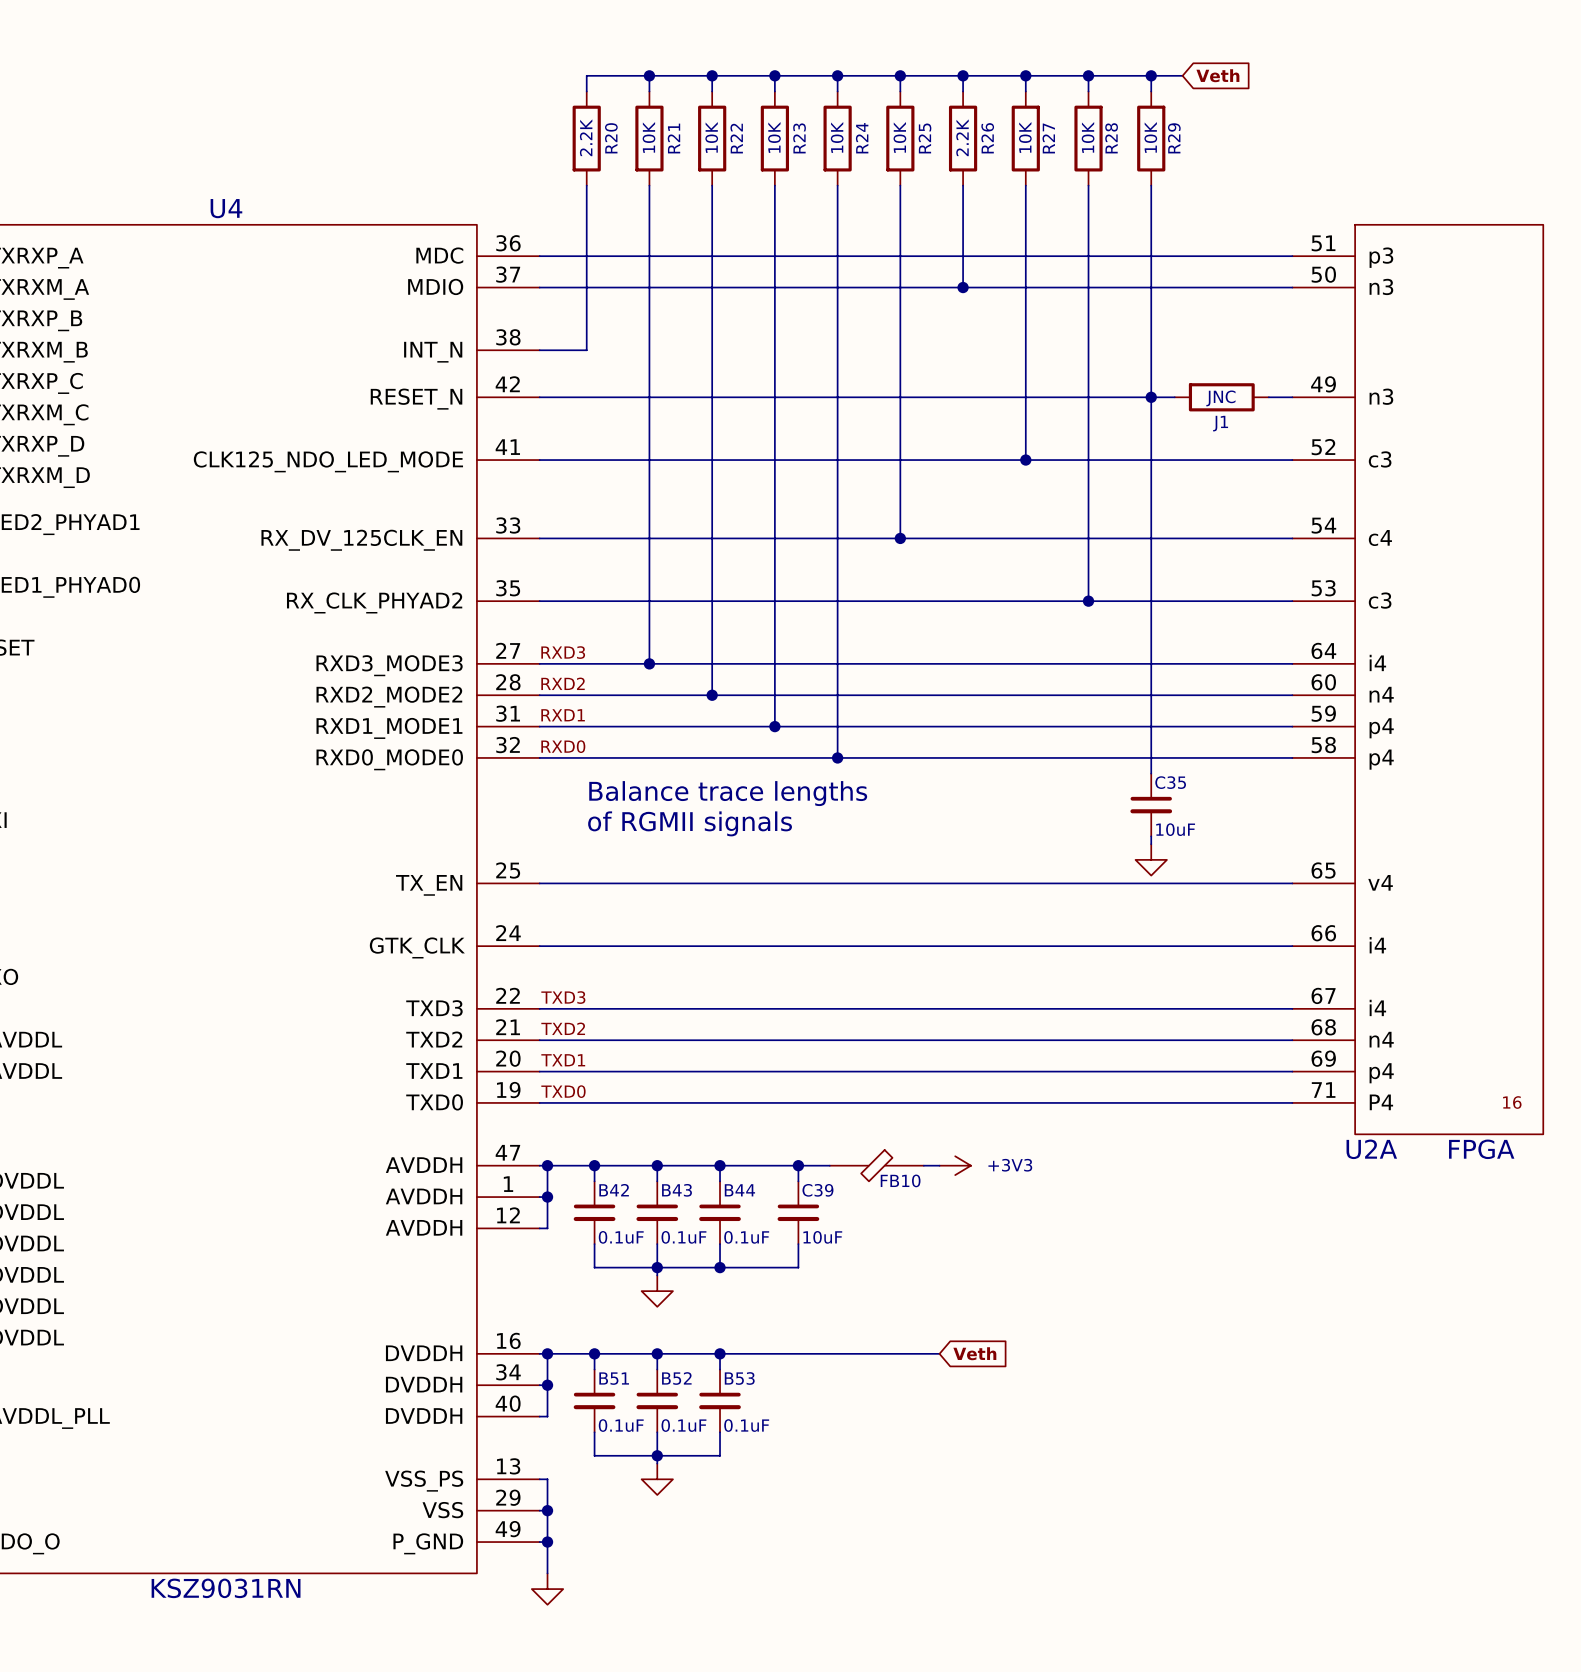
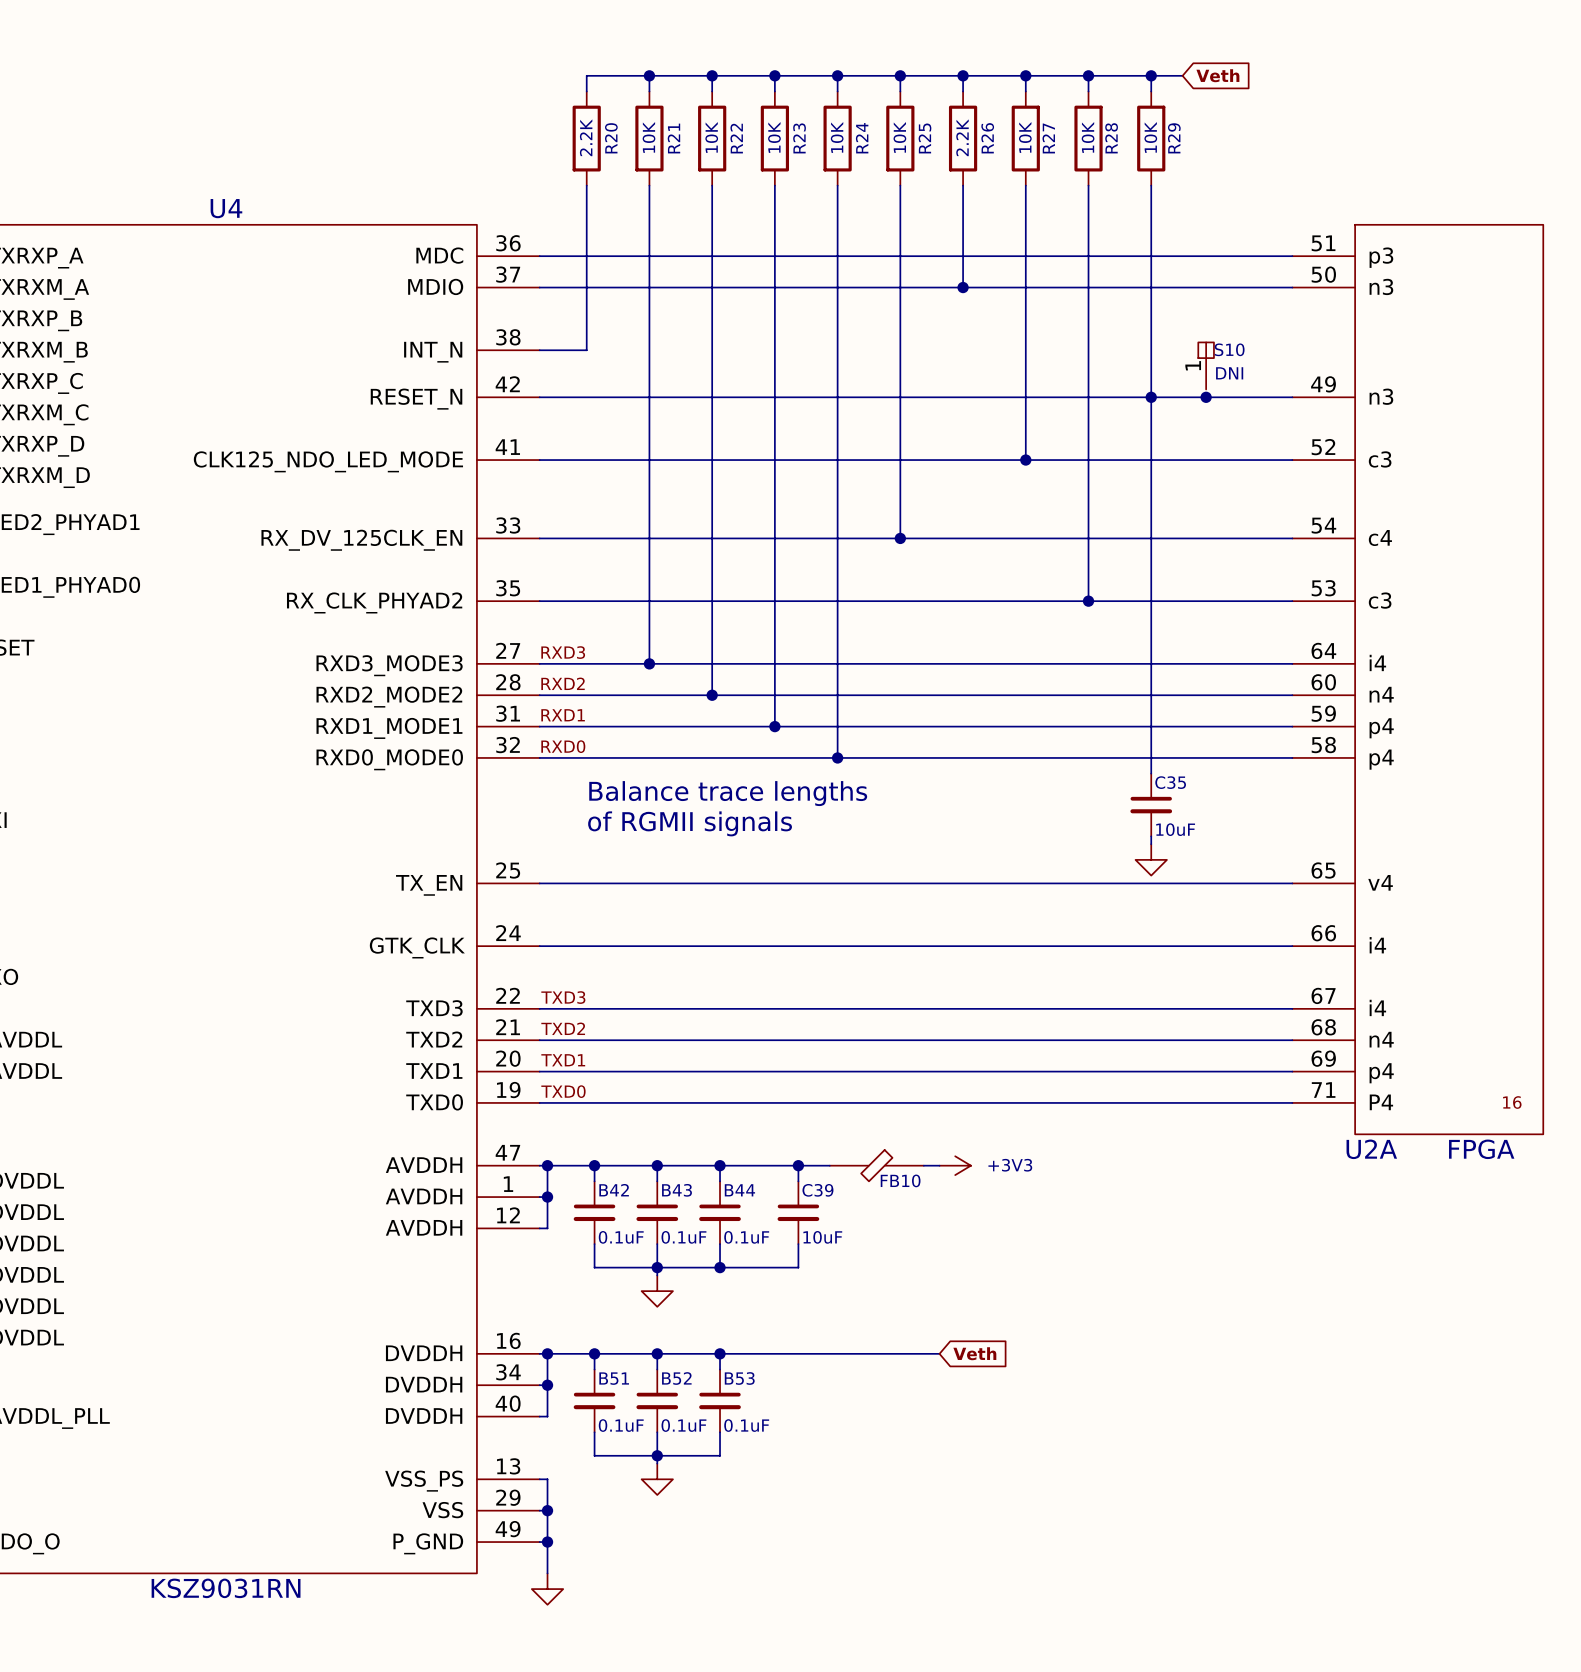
S10: none -> (1206, 365)
wire: none -> (1174, 397) (1268, 397)
junction: none -> (1206, 397)
J1: JNC (1221, 397) -> none

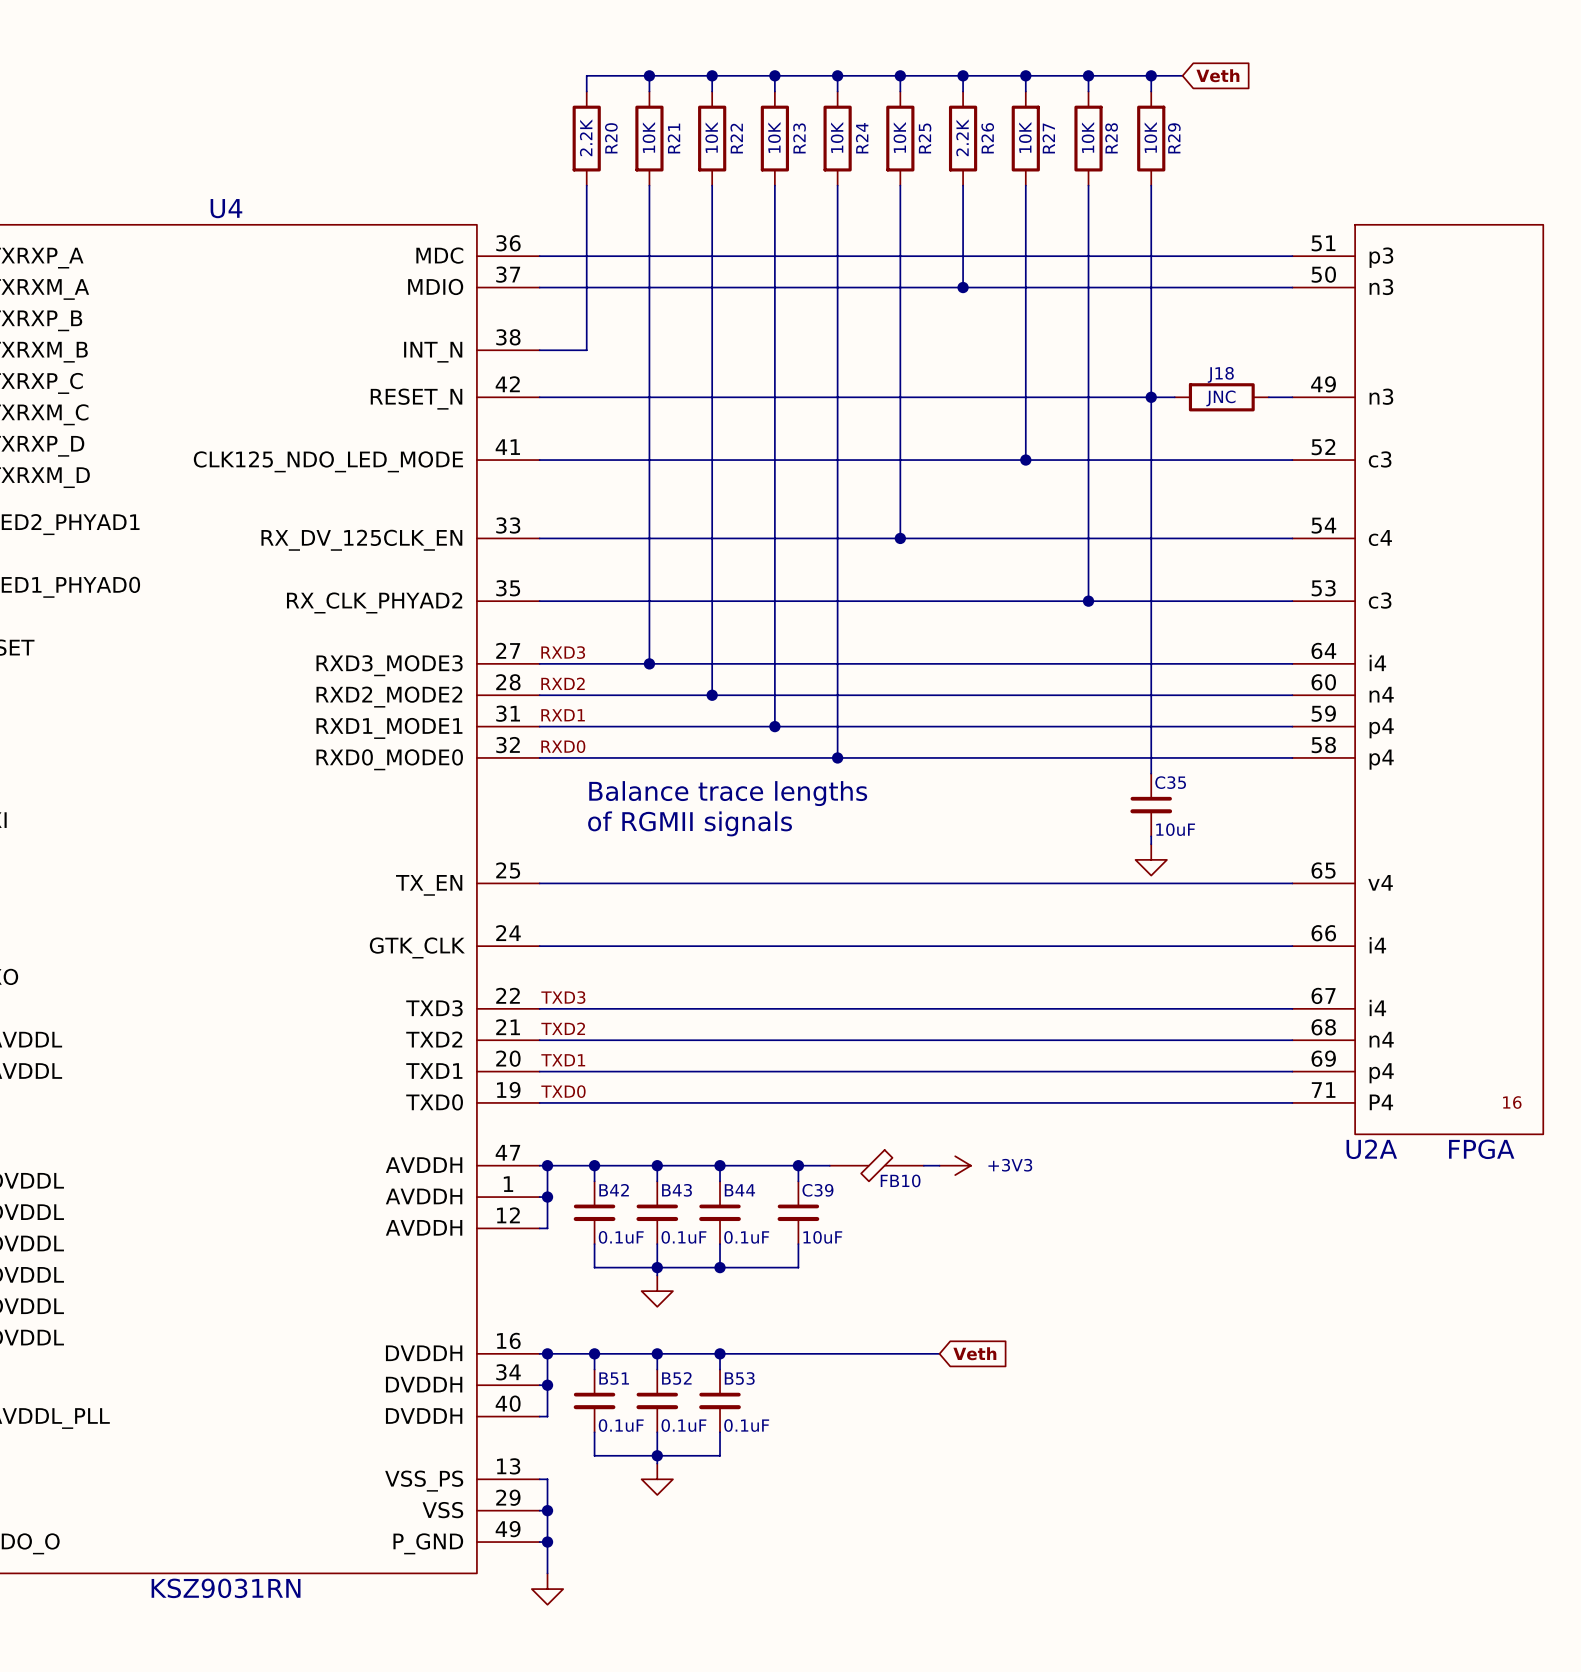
S10: (1206, 365) -> none
wire: (1174, 397) (1268, 397) -> none
junction: (1206, 397) -> none
J18: none -> JNC (1221, 397)

